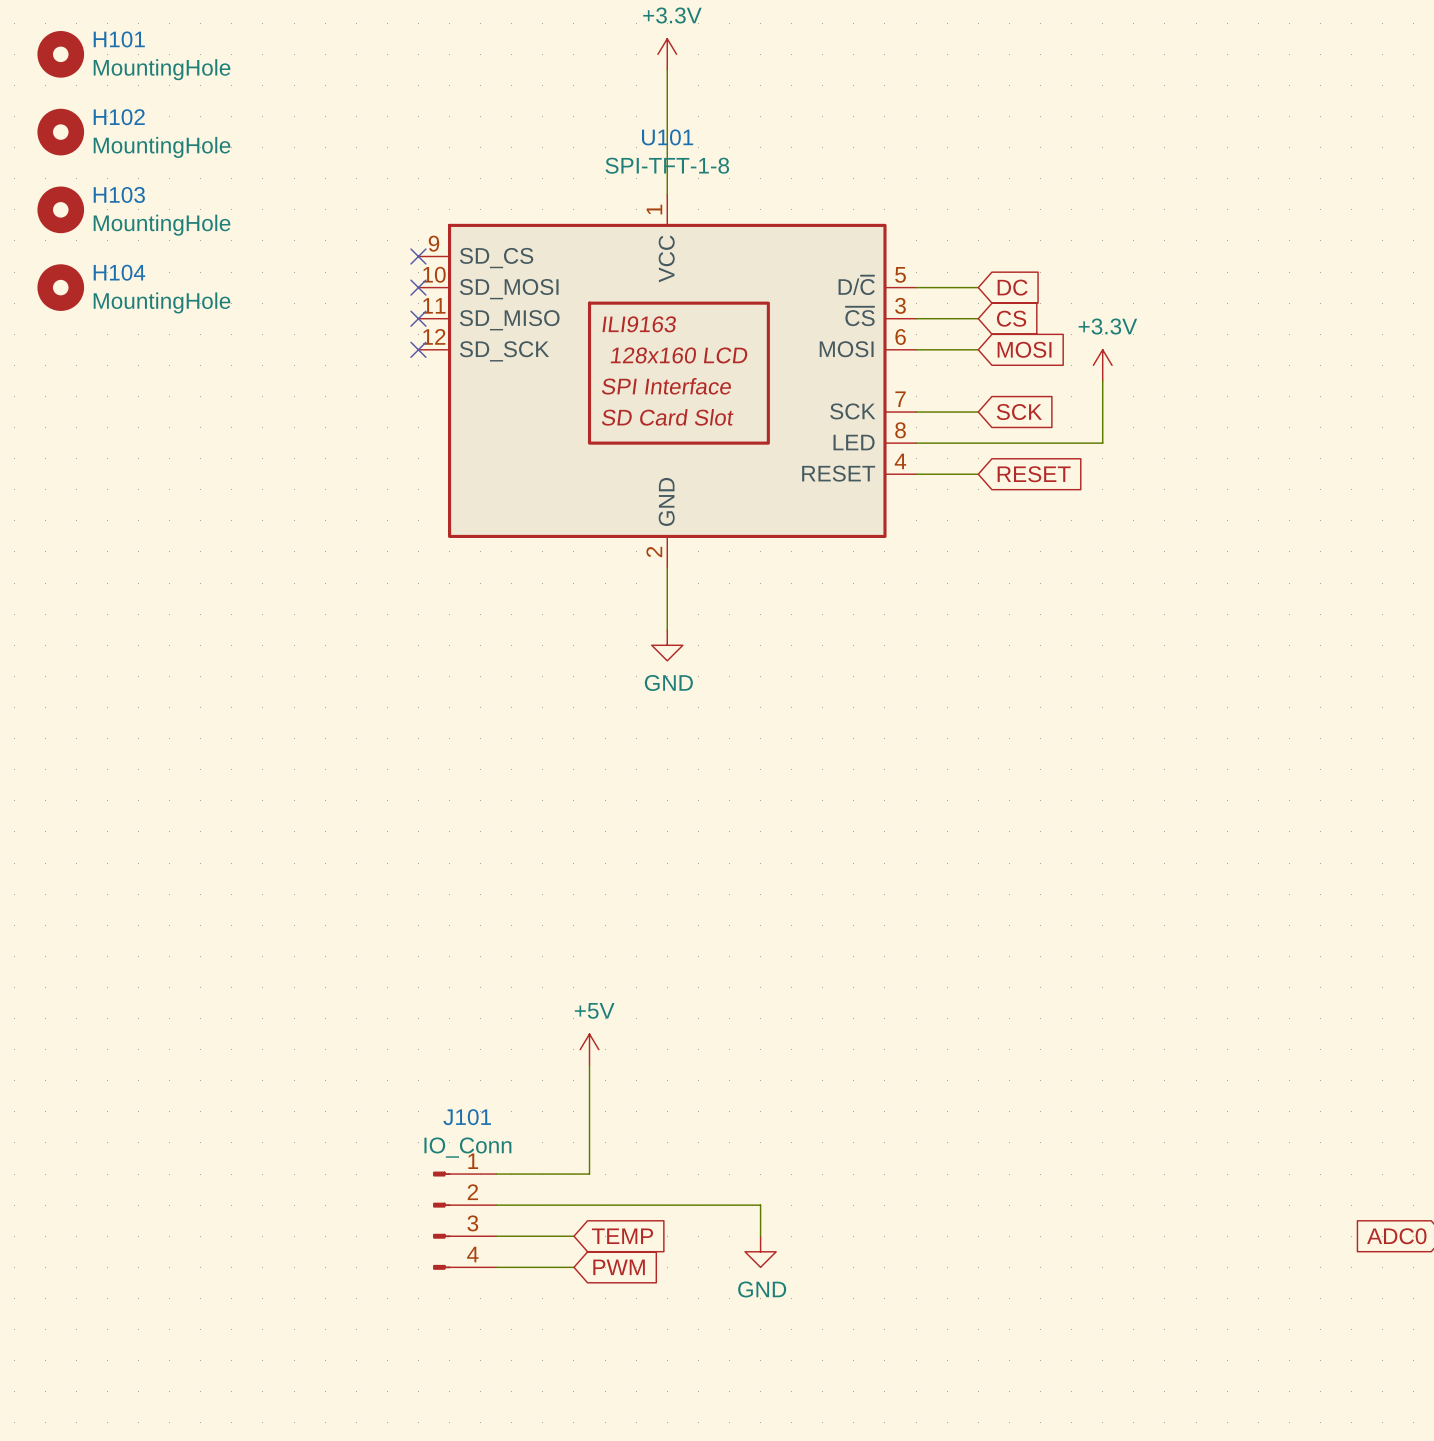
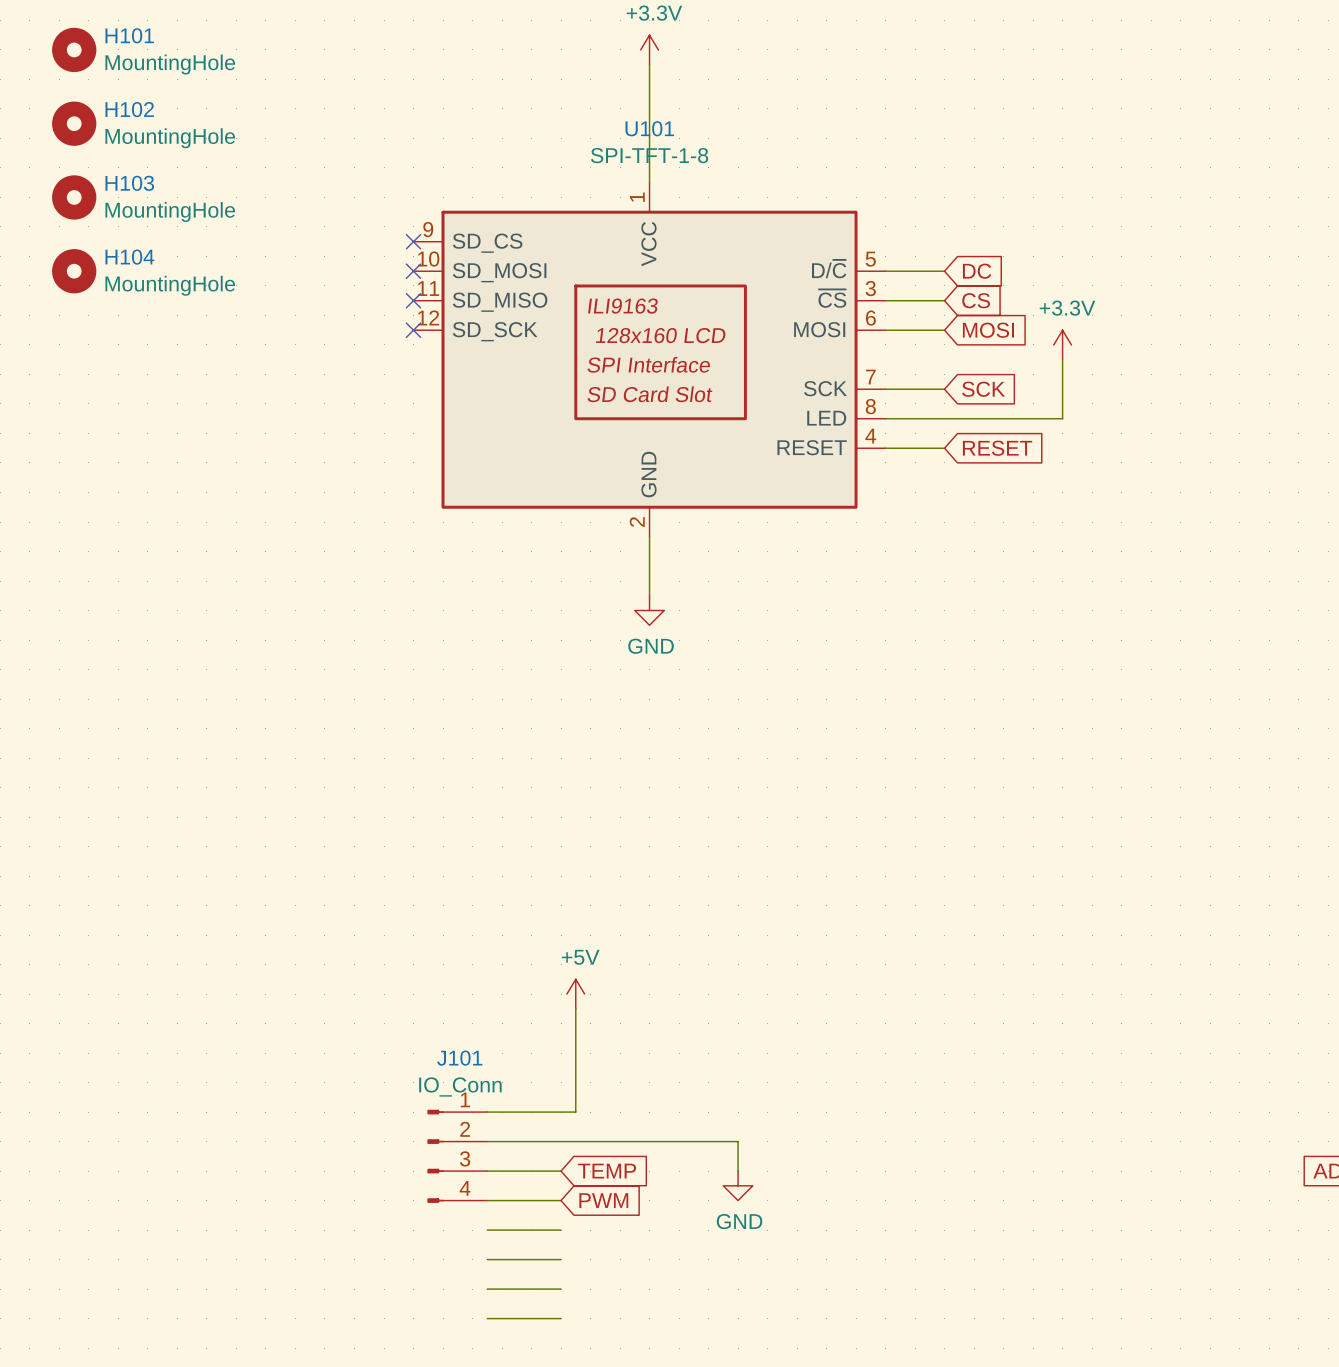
wire: none -> (487, 1230) (561, 1230)
wire: none -> (487, 1259) (561, 1259)
wire: none -> (487, 1289) (561, 1289)
wire: none -> (487, 1318) (561, 1318)

